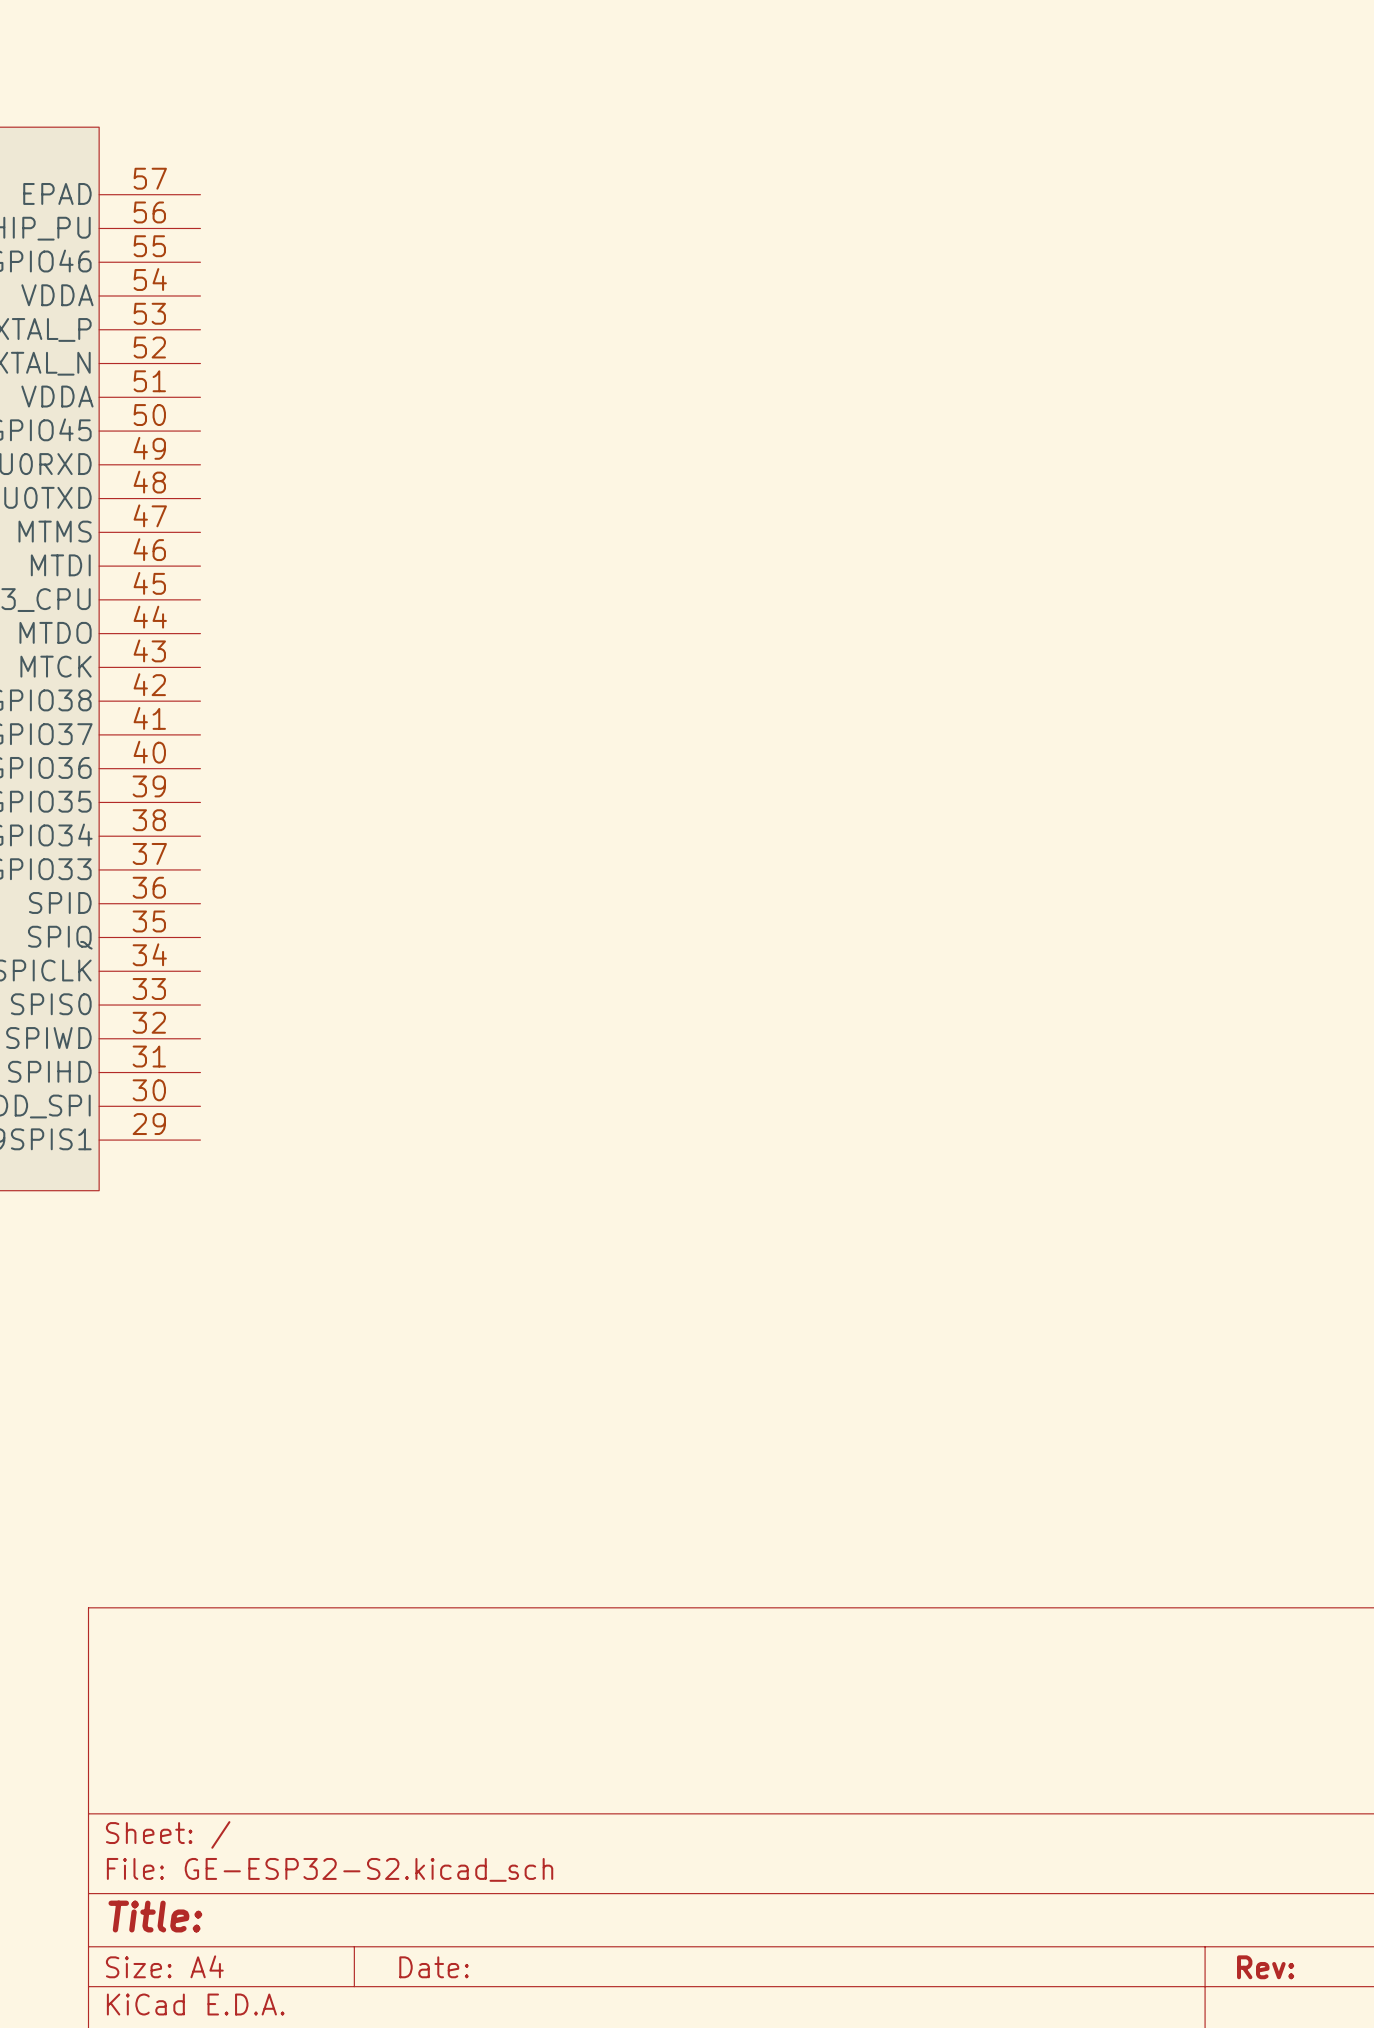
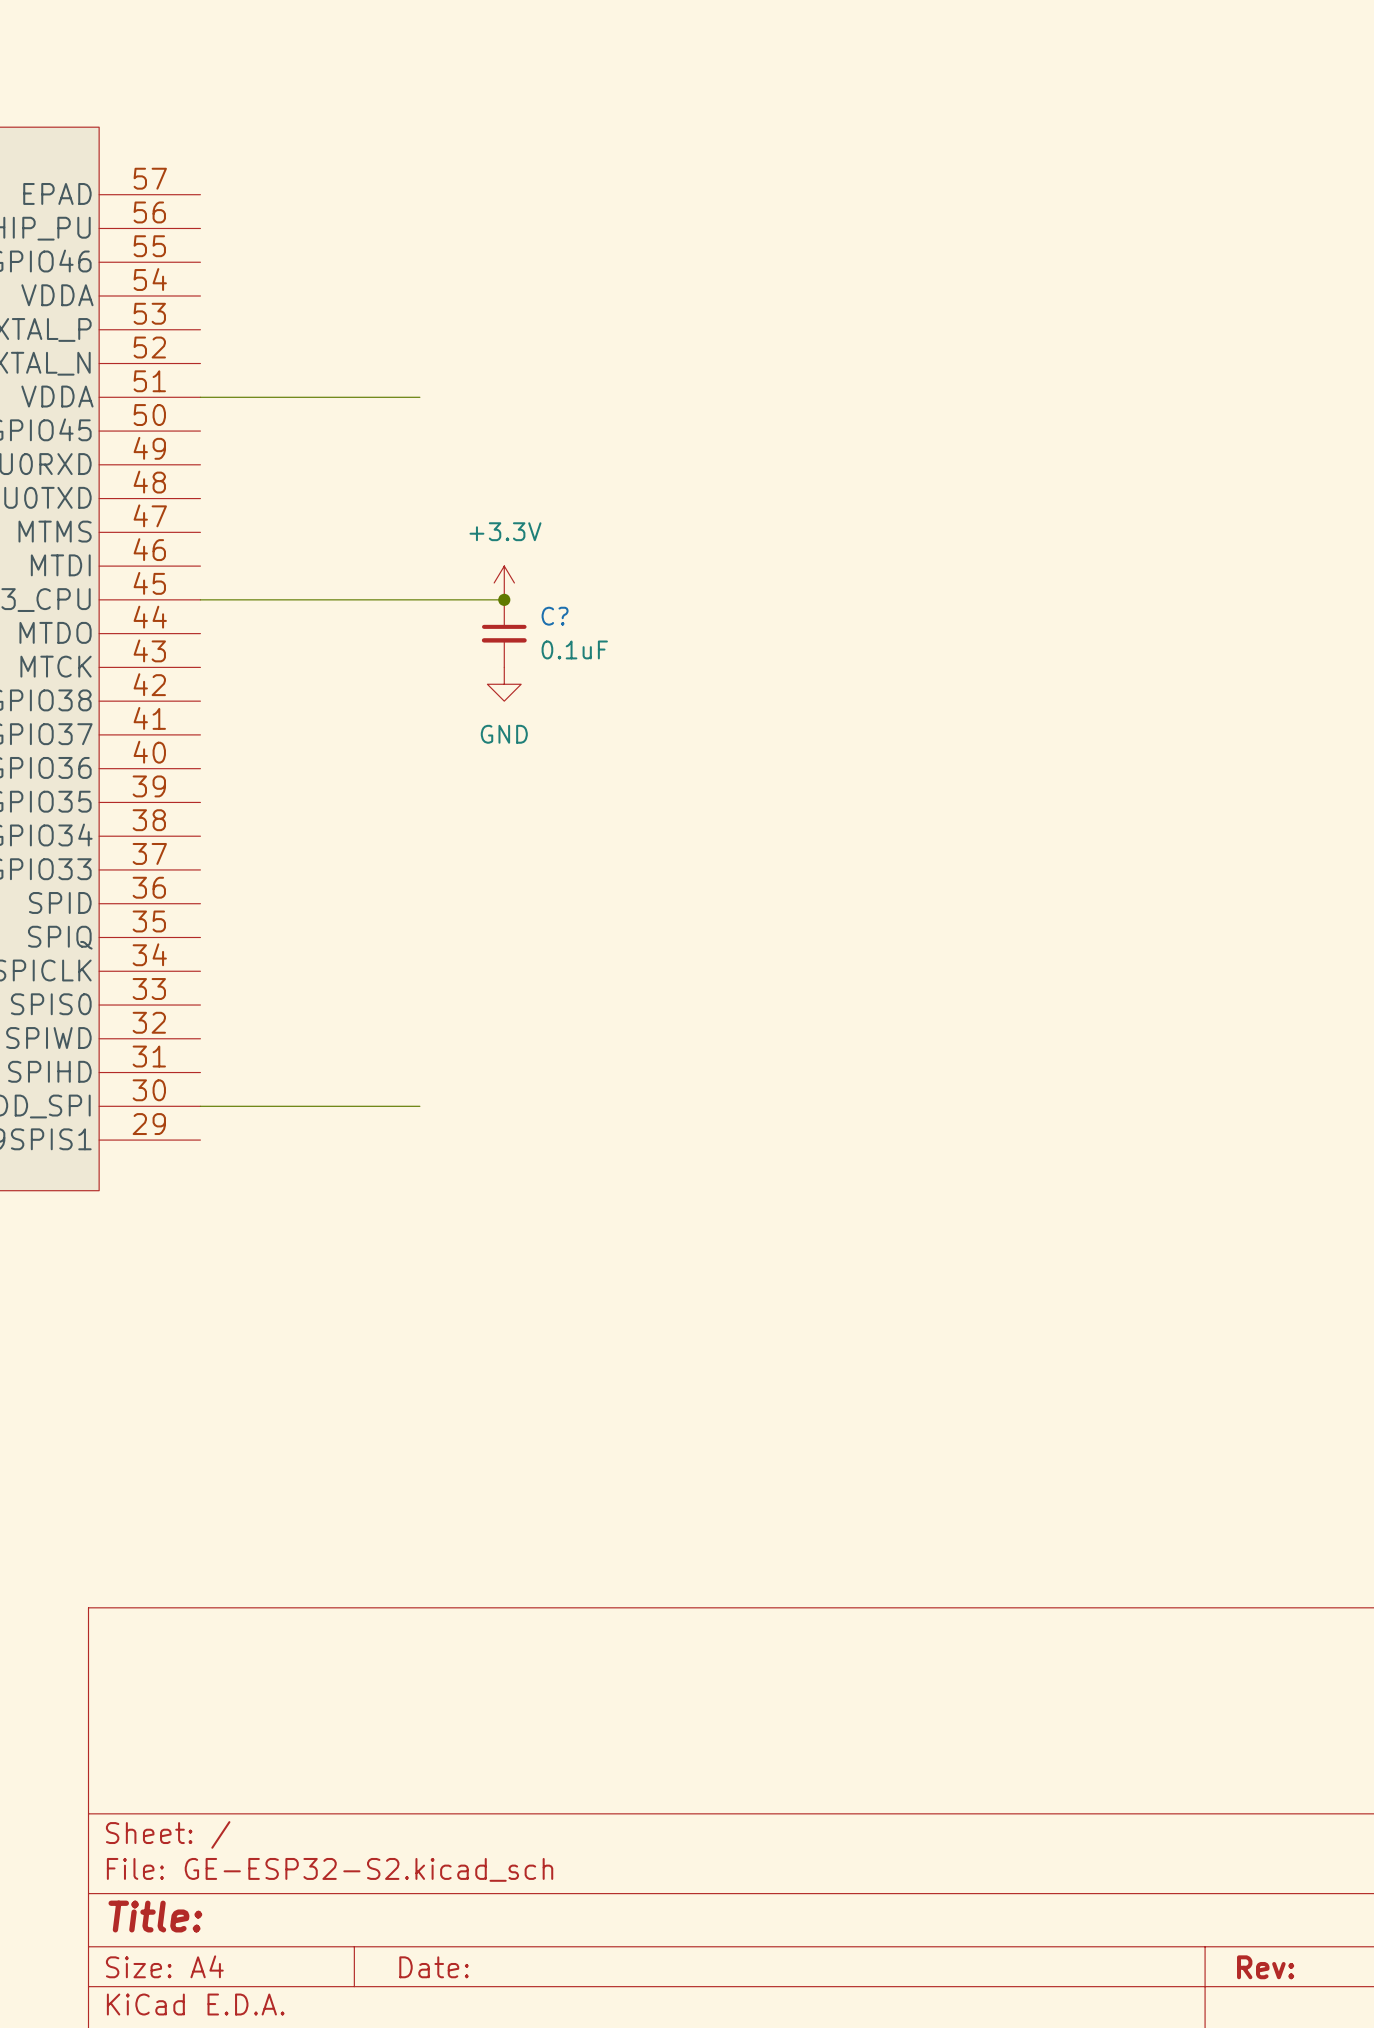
wire: none -> (200, 397) (419, 397)
power symbol: none -> +3.3V (504, 582)
wire: none -> (200, 599) (504, 599)
junction: none -> (504, 599)
C?: none -> 0.1uF (504, 633)
power symbol: none -> GND (504, 684)
wire: none -> (200, 1106) (419, 1106)

